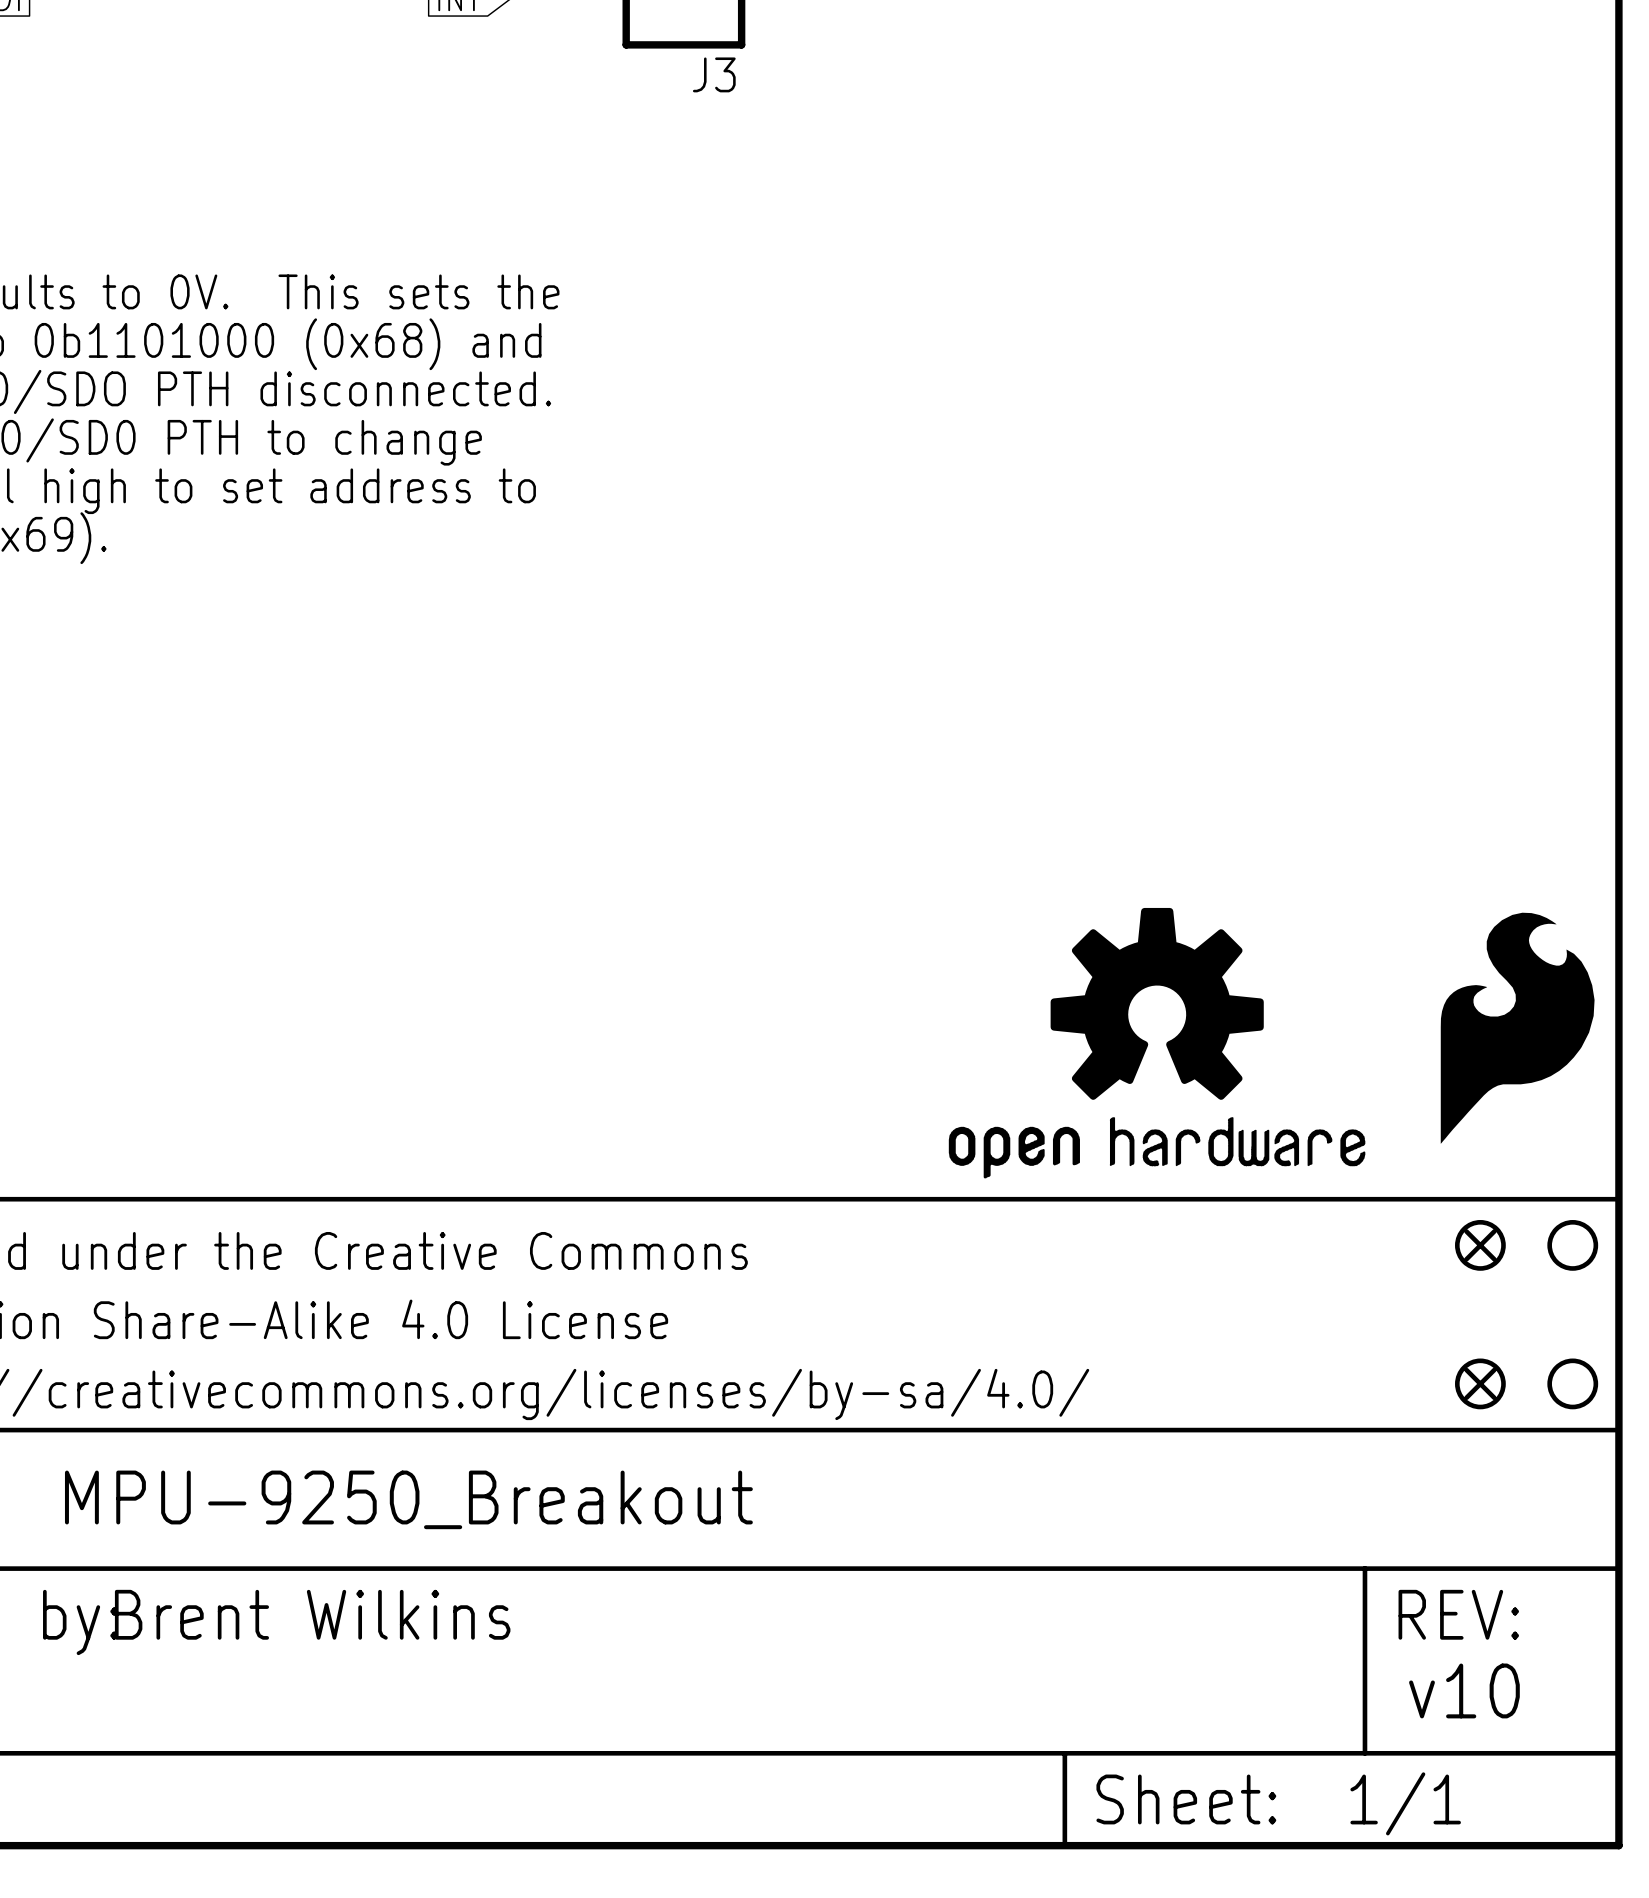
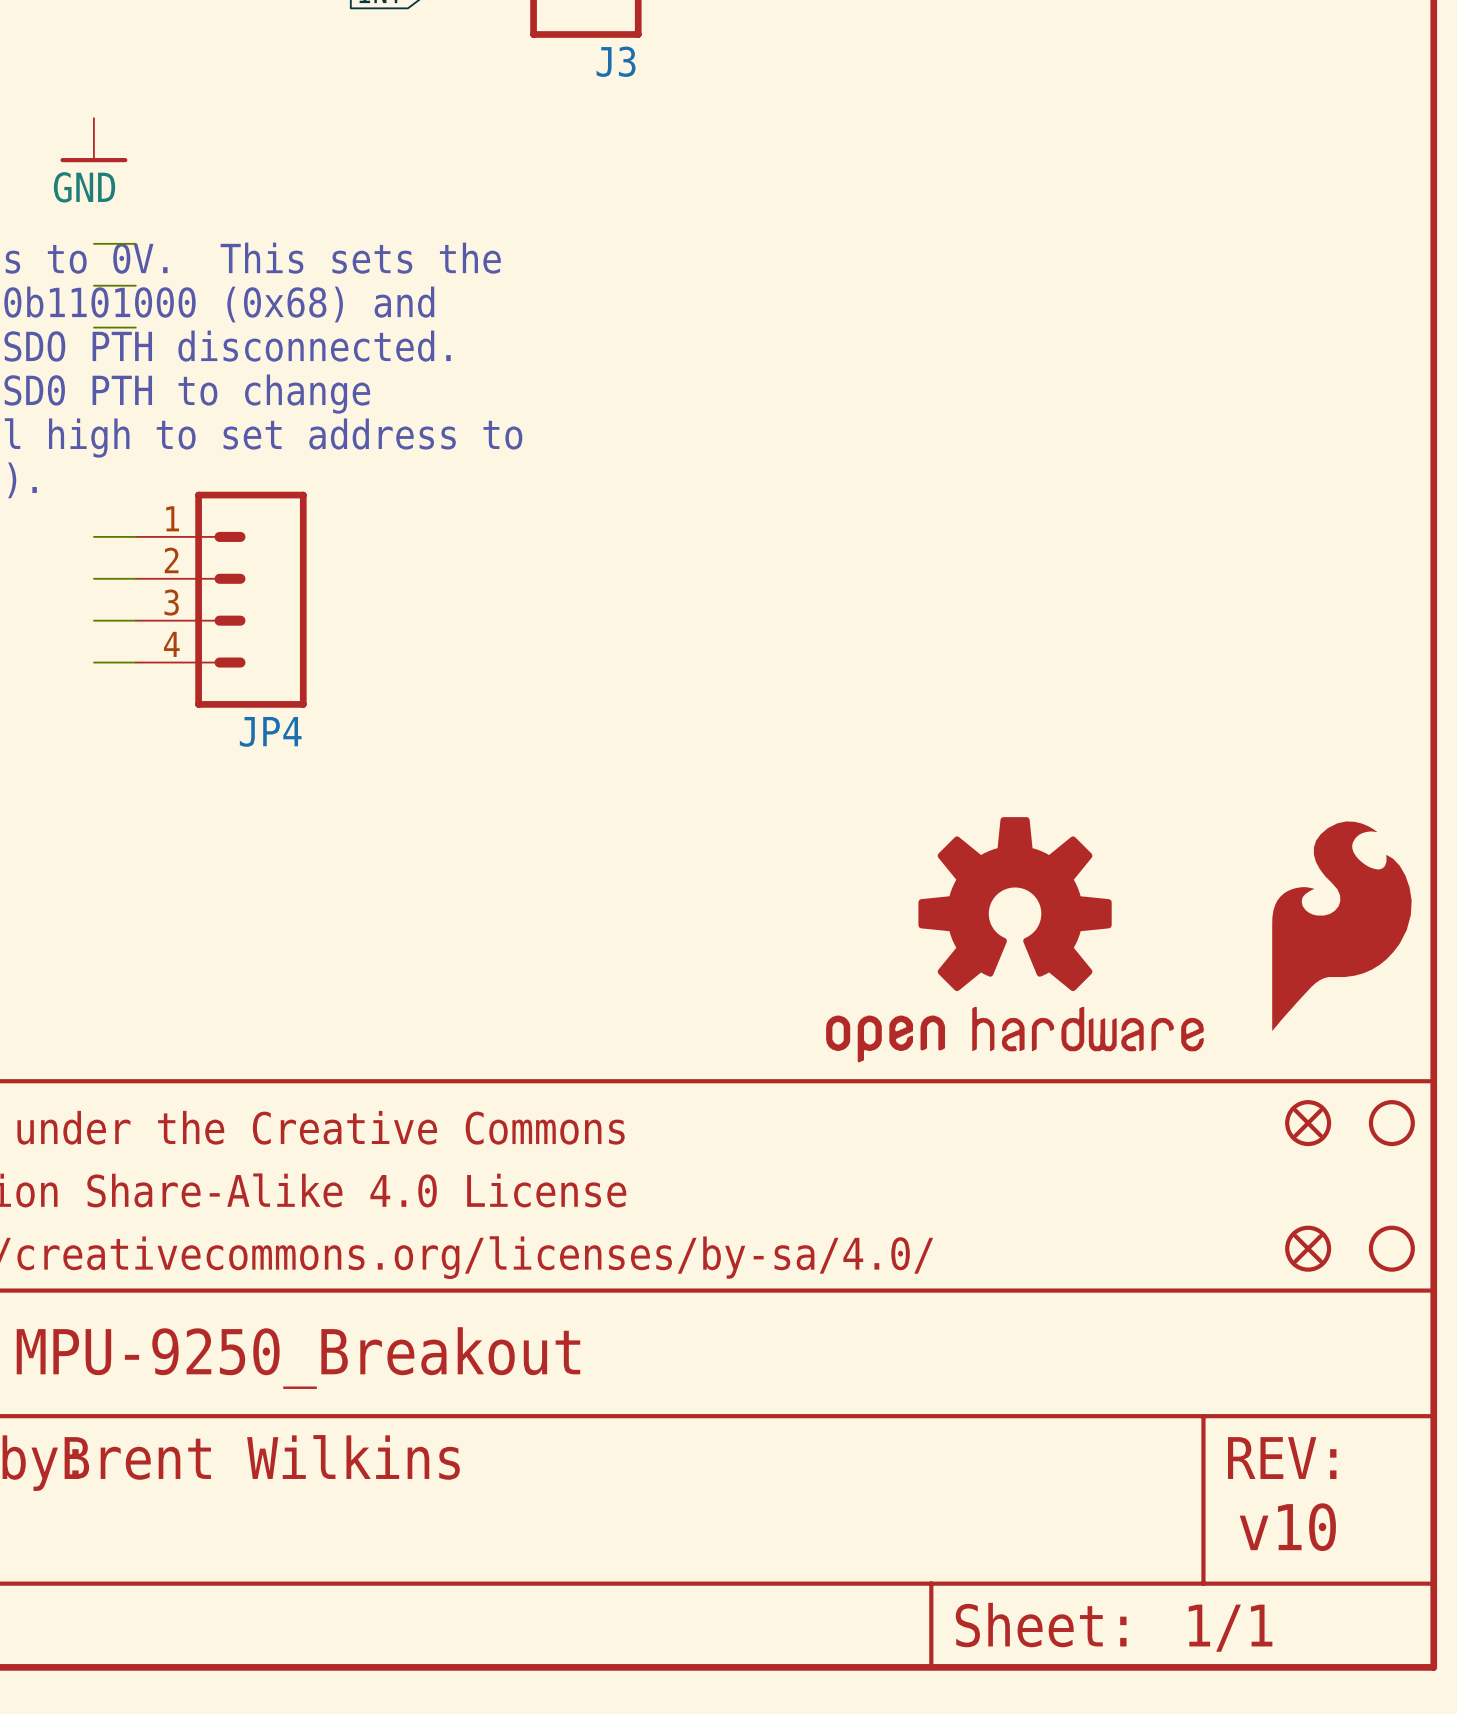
power symbol: none -> GND (93, 140)
wire: none -> (93, 243) (135, 243)
wire: none -> (93, 285) (135, 285)
wire: none -> (93, 327) (135, 327)
wire: none -> (93, 536) (135, 536)
wire: none -> (93, 578) (135, 578)
JP4: none -> (221, 599)
wire: none -> (93, 620) (135, 620)
wire: none -> (93, 662) (135, 662)

